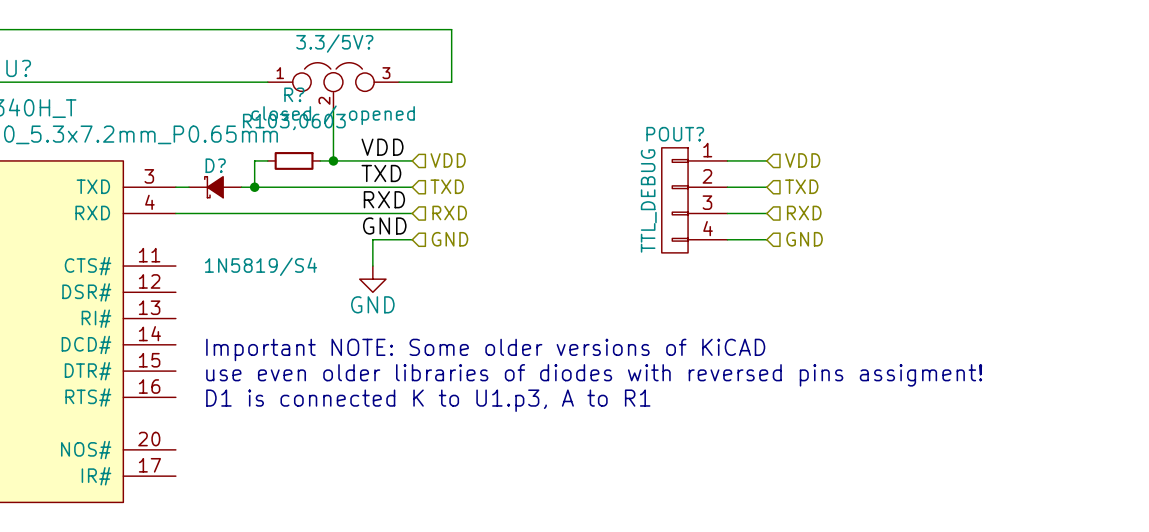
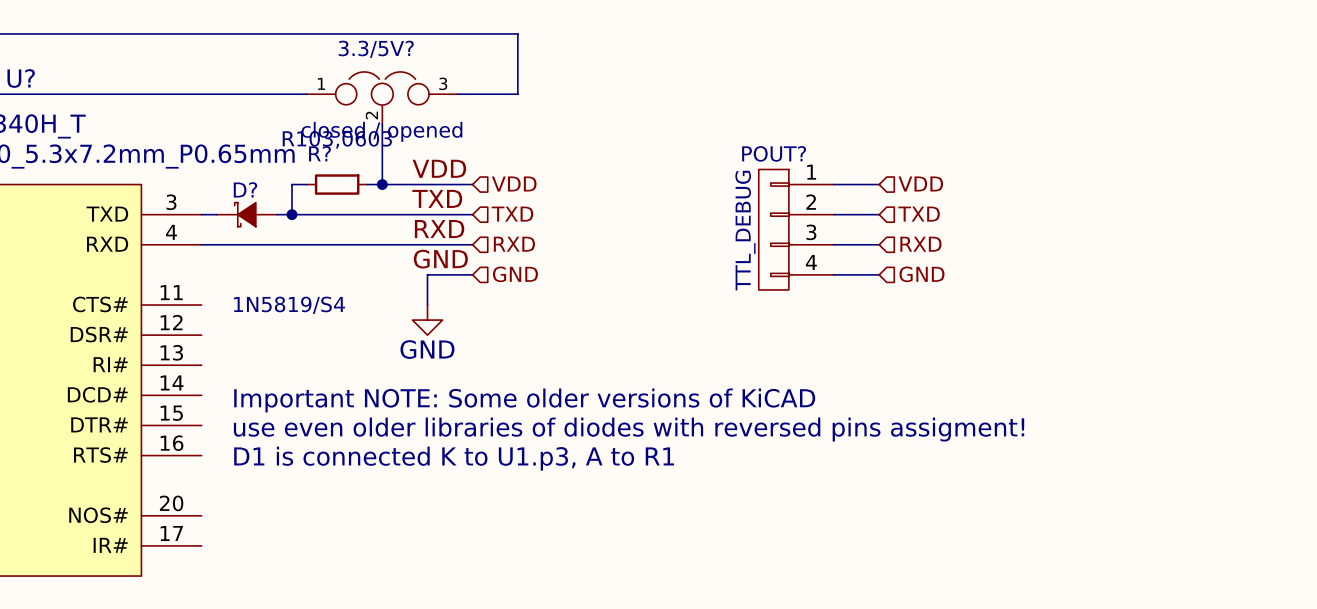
R? name position: R? (294, 94) -> R? (319, 153)

